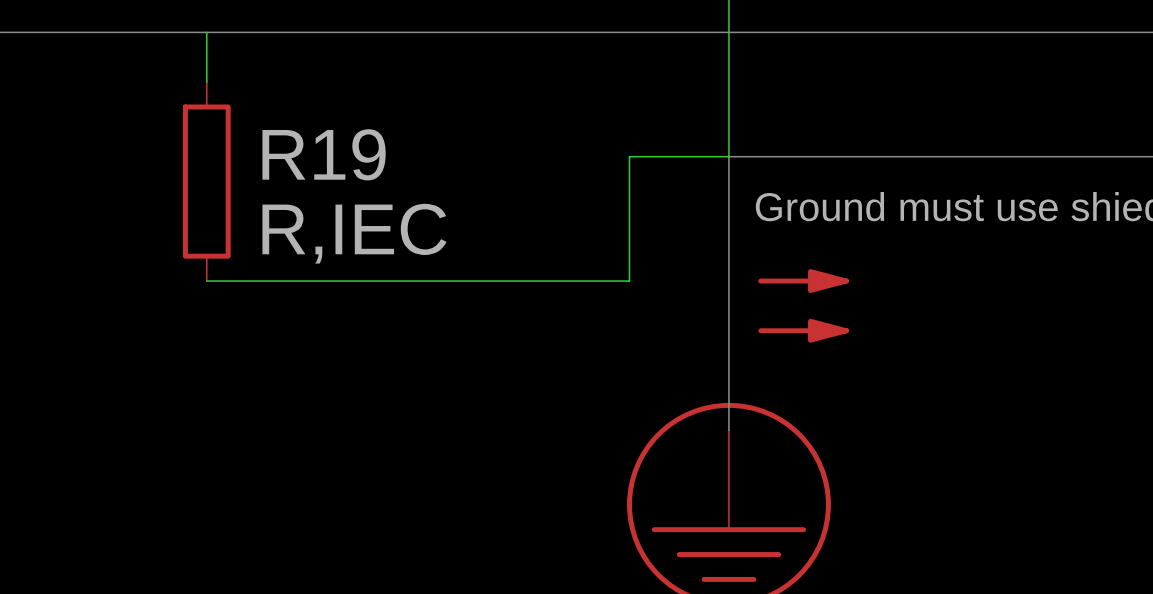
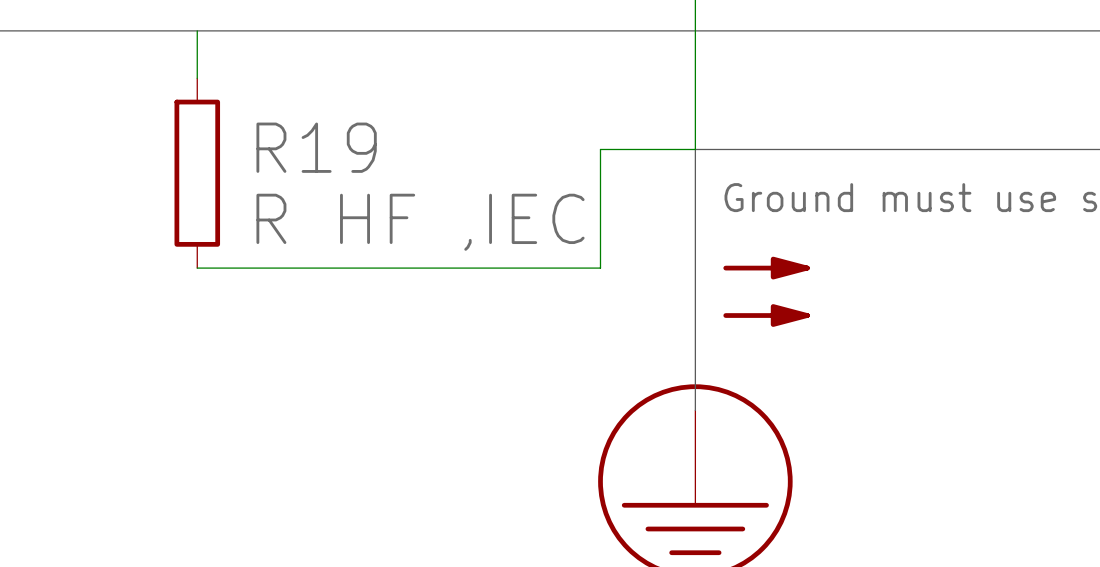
R19 value: R,IEC (354, 233) -> R HF ,IEC (420, 222)

